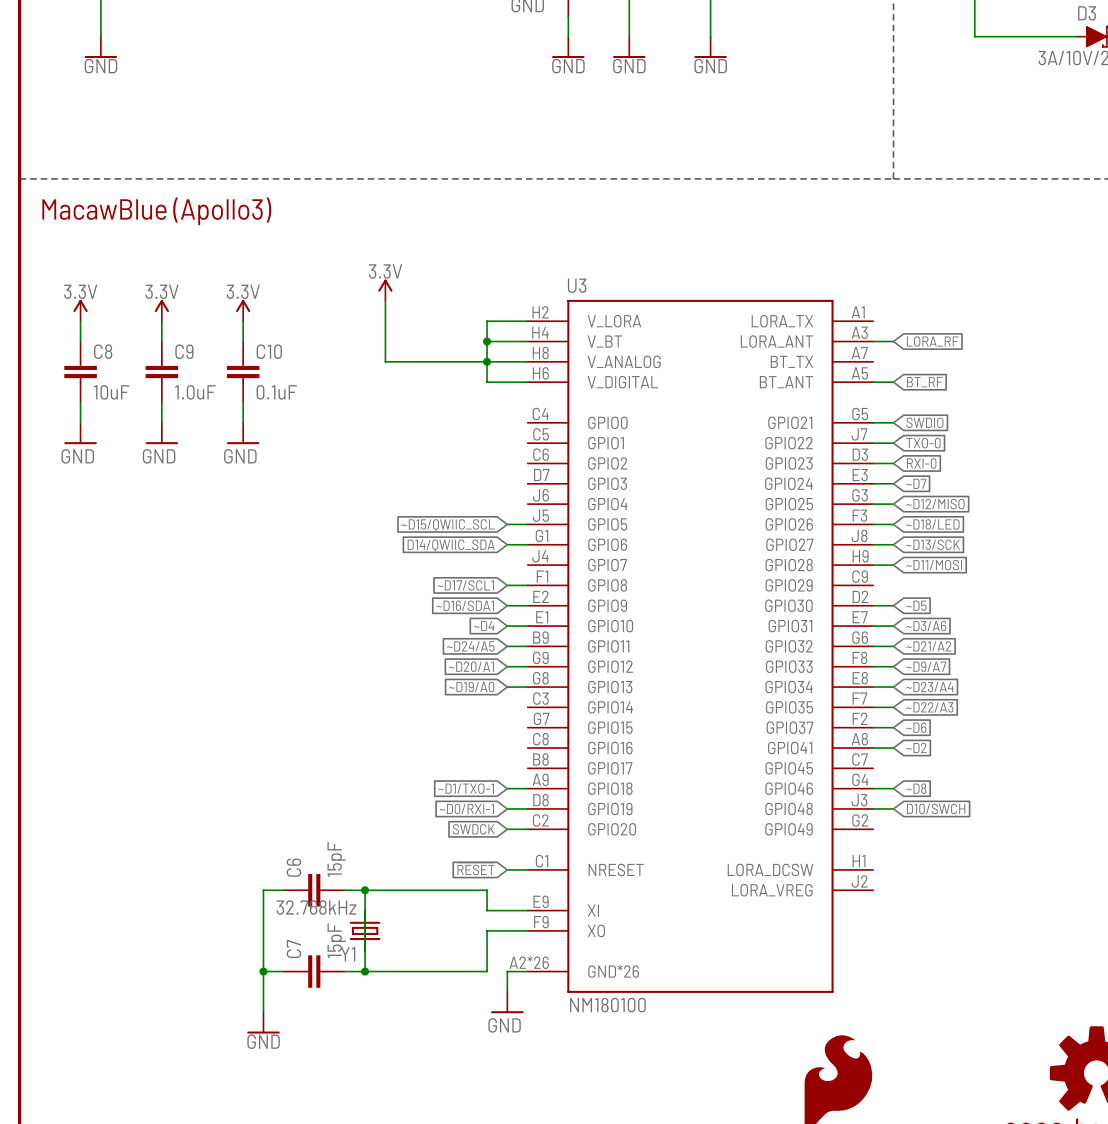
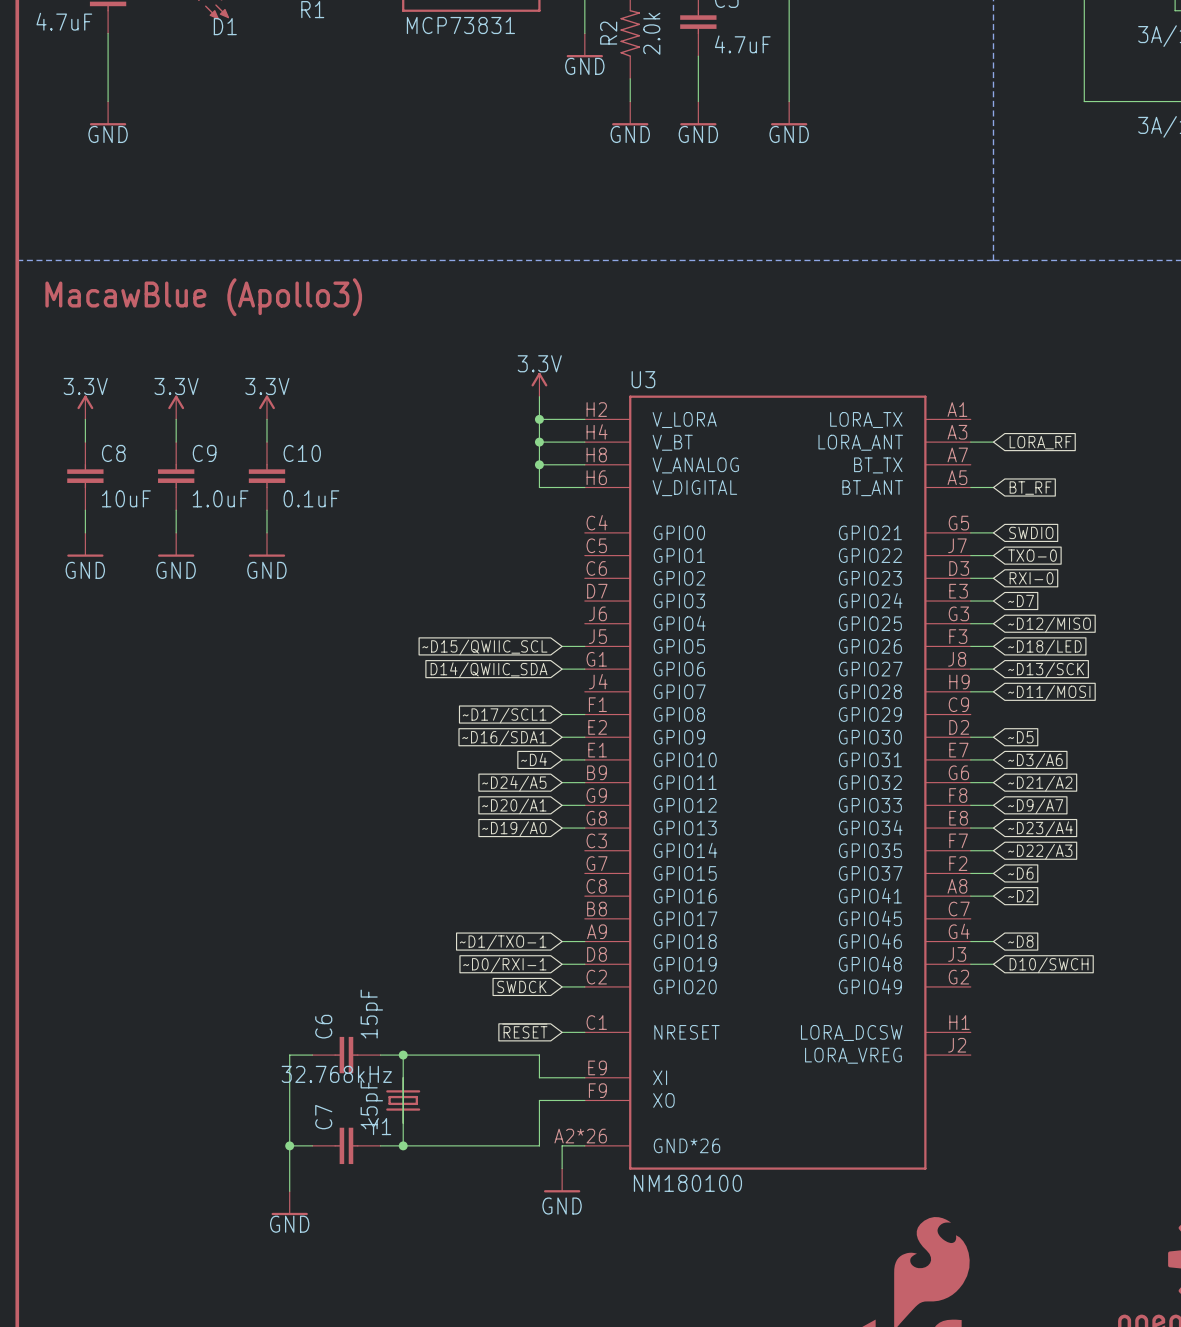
power symbol position: 3.3V (385, 290) -> 3.3V (539, 384)
wire: (385, 300) (385, 361) (487, 361) -> none
wire: none -> (539, 396) (539, 419)
junction: none -> (539, 419)

